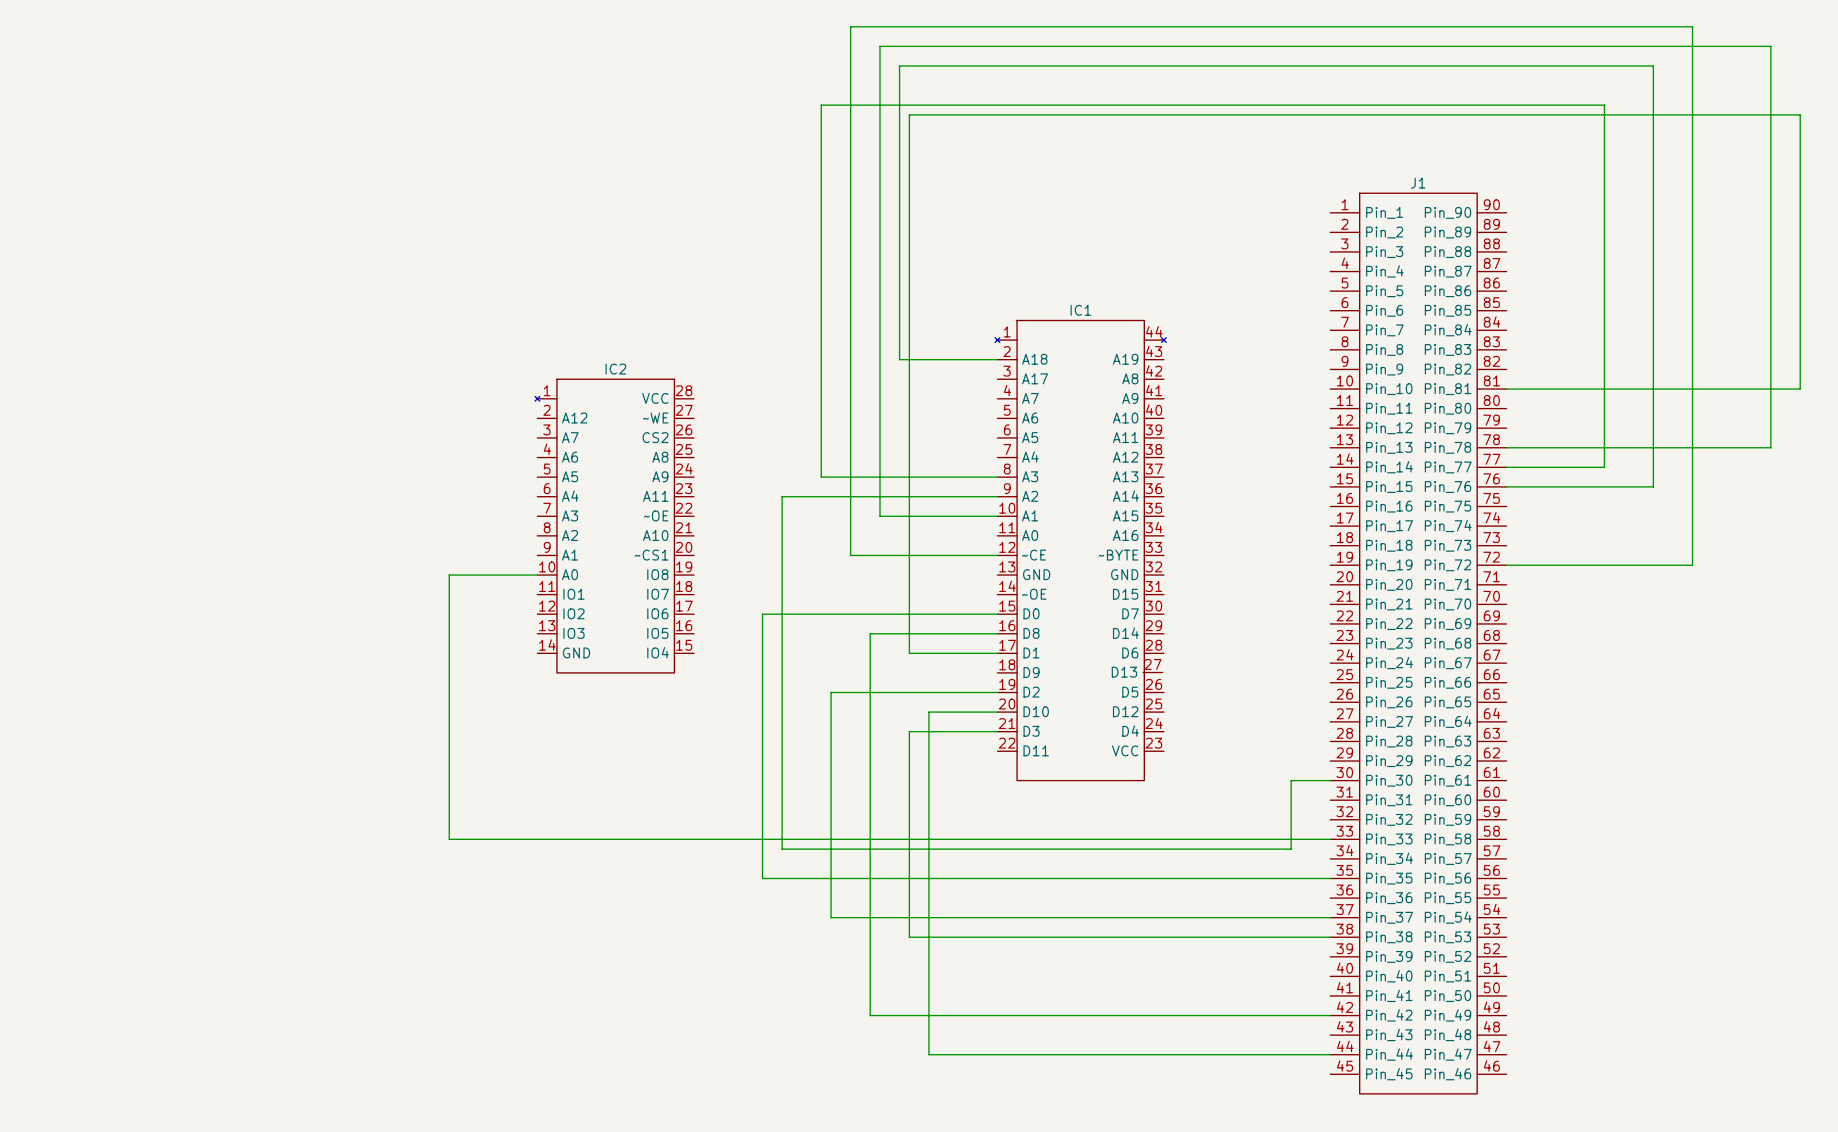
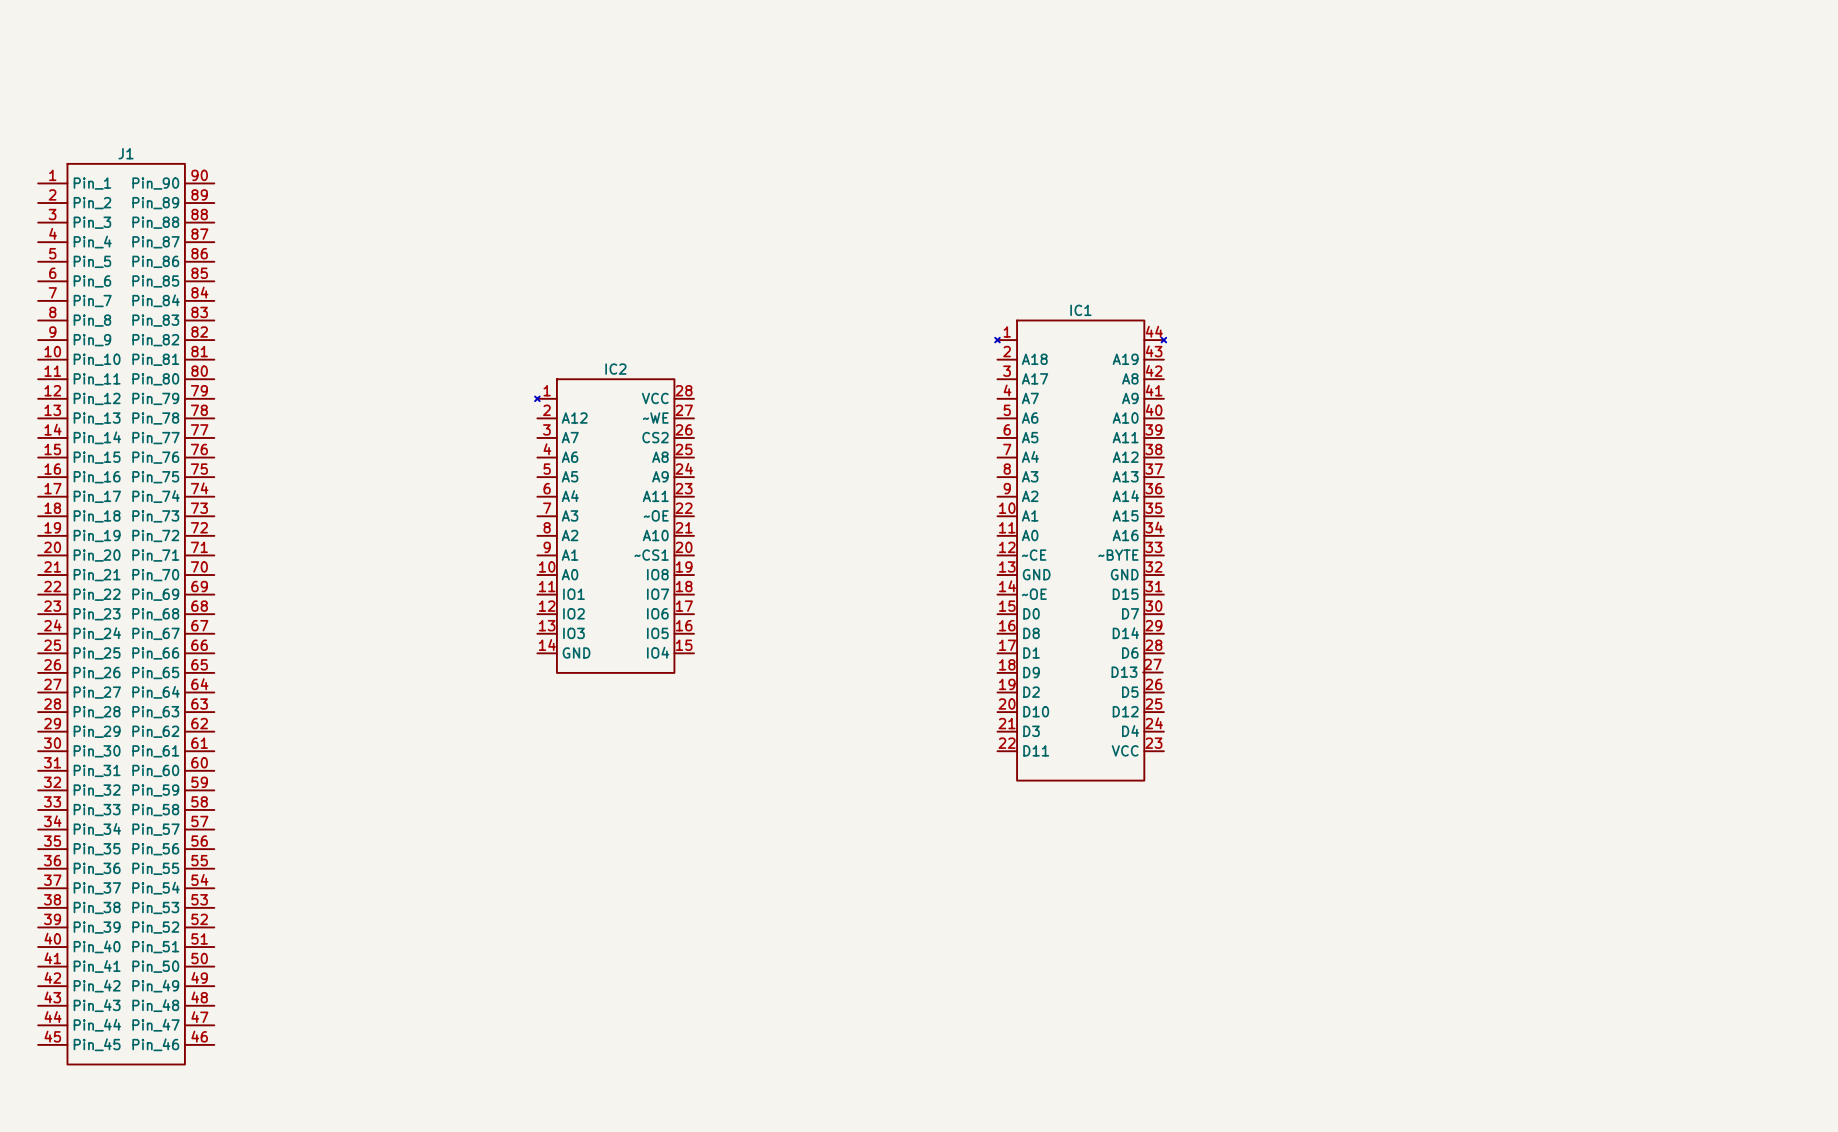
wire: (997, 359) (899, 359) (899, 65) (1653, 65) (1653, 486) (1506, 486) -> none
wire: (1506, 389) (1800, 389) (1800, 114) (909, 114) (909, 653) (997, 653) -> none
wire: (1506, 447) (1770, 447) (1770, 46) (880, 46) (880, 516) (997, 516) -> none
wire: (1506, 467) (1604, 467) (1604, 105) (821, 105) (821, 477) (997, 477) -> none
wire: (997, 496) (782, 496) (782, 849) (1291, 849) (1291, 780) (1330, 780) -> none
wire: (997, 555) (850, 555) (850, 26) (1692, 26) (1692, 565) (1506, 565) -> none
wire: (537, 575) (449, 575) (449, 839) (1330, 839) -> none
wire: (997, 614) (762, 614) (762, 878) (1330, 878) -> none
wire: (997, 633) (870, 633) (870, 1015) (1330, 1015) -> none
J1 position: (1418, 643) -> (126, 614)
wire: (997, 692) (831, 692) (831, 917) (1330, 917) -> none
wire: (997, 712) (928, 712) (928, 1054) (1330, 1054) -> none
wire: (997, 731) (909, 731) (909, 937) (1330, 937) -> none

